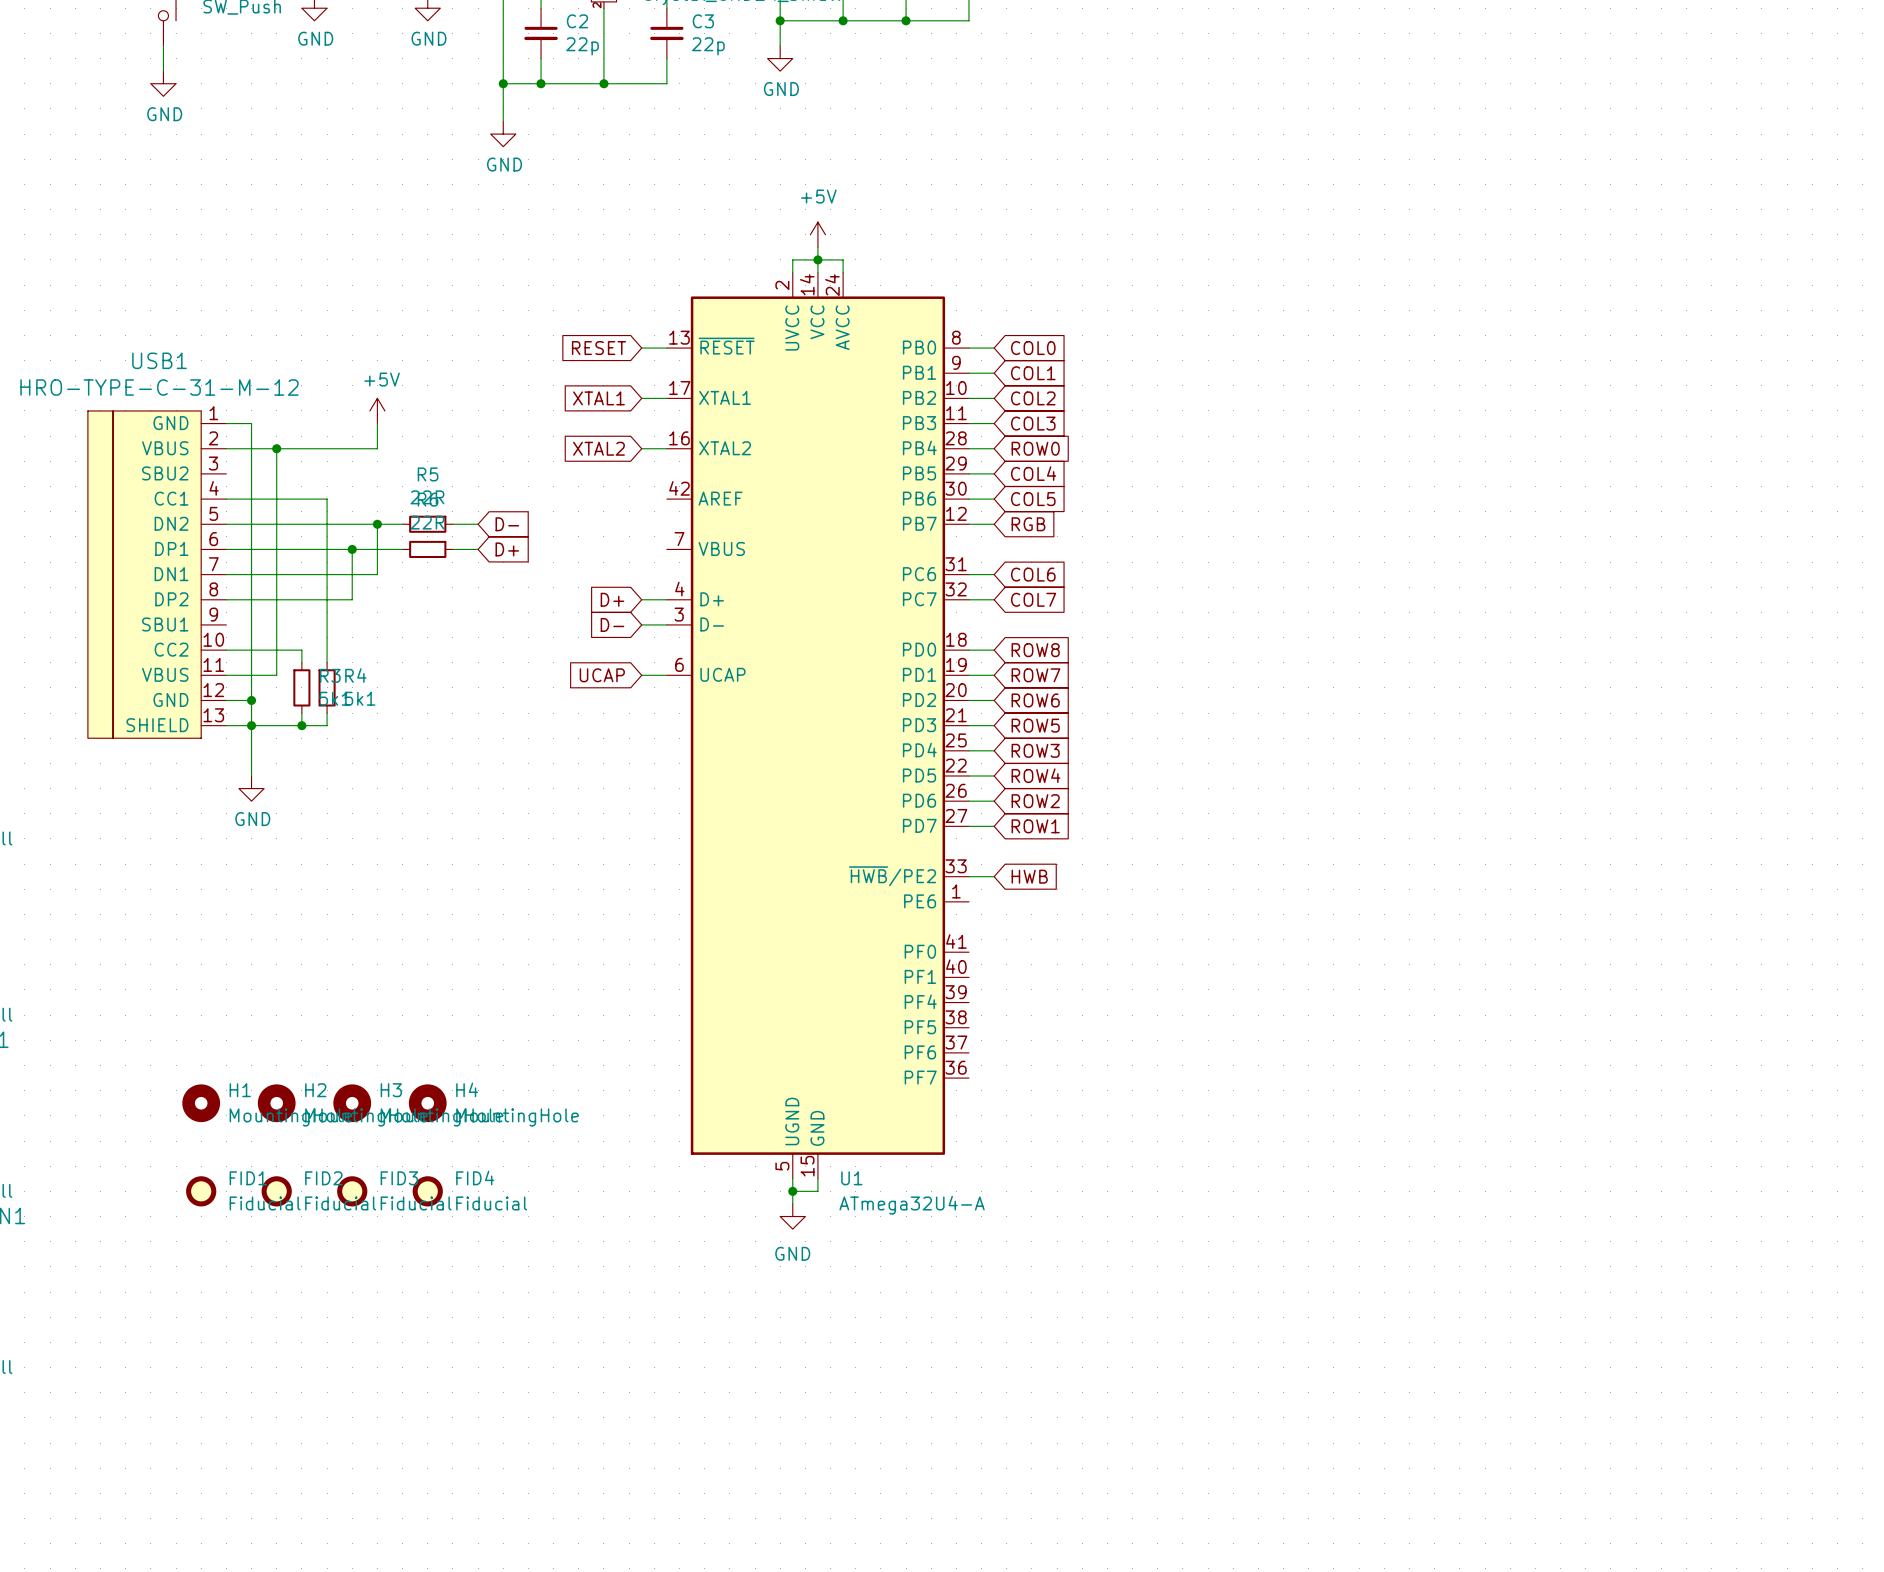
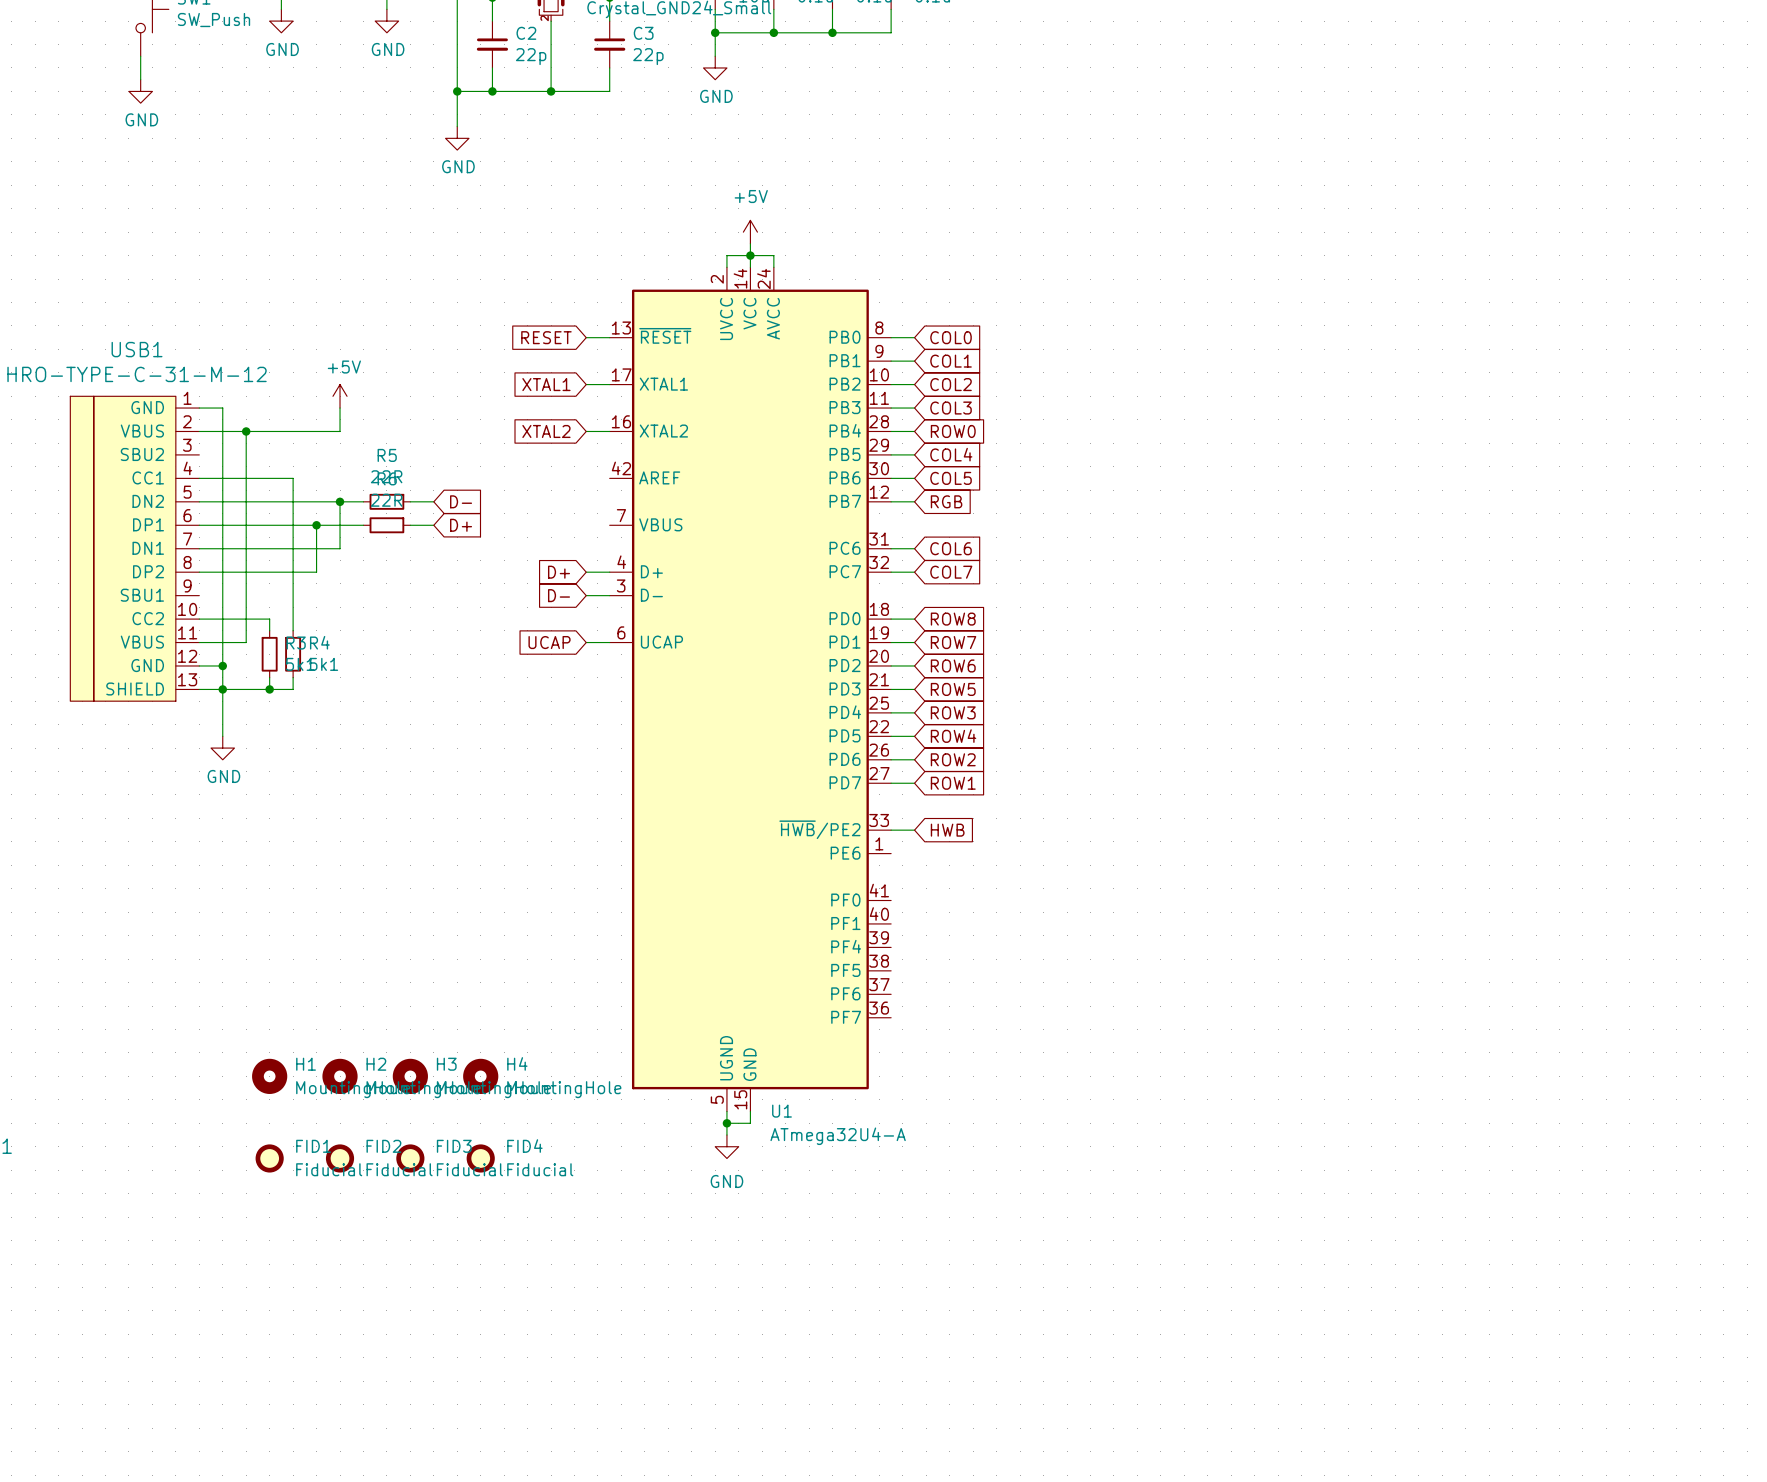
H1 position: (201, 1103) -> (269, 1076)
H2 position: (276, 1103) -> (340, 1076)
H3 position: (352, 1103) -> (410, 1076)
H4 position: (427, 1103) -> (480, 1076)
FID1 position: (201, 1191) -> (269, 1158)
FID2 position: (276, 1191) -> (340, 1158)
FID3 position: (352, 1191) -> (410, 1158)
FID4 position: (427, 1191) -> (480, 1158)

